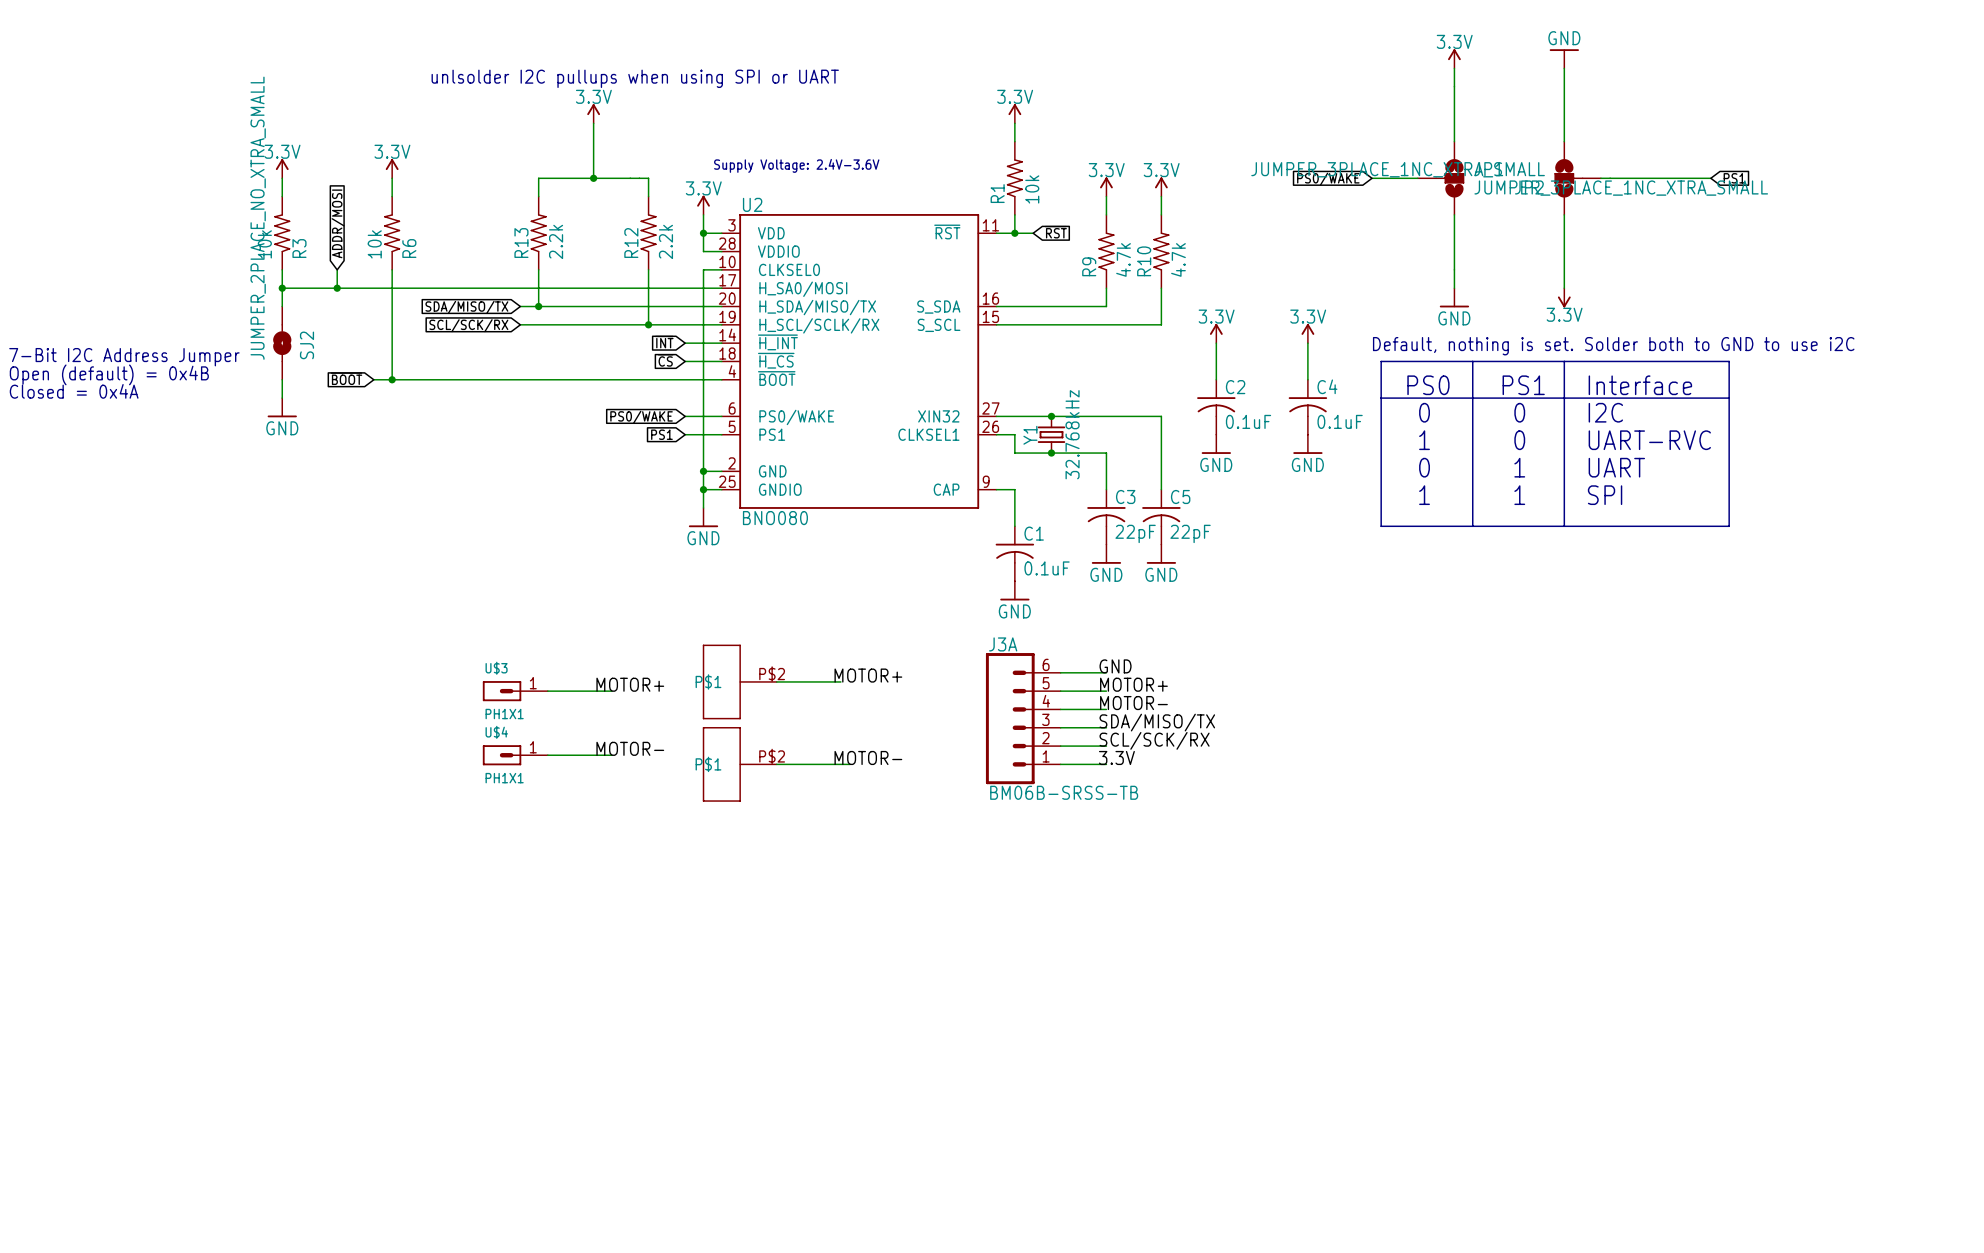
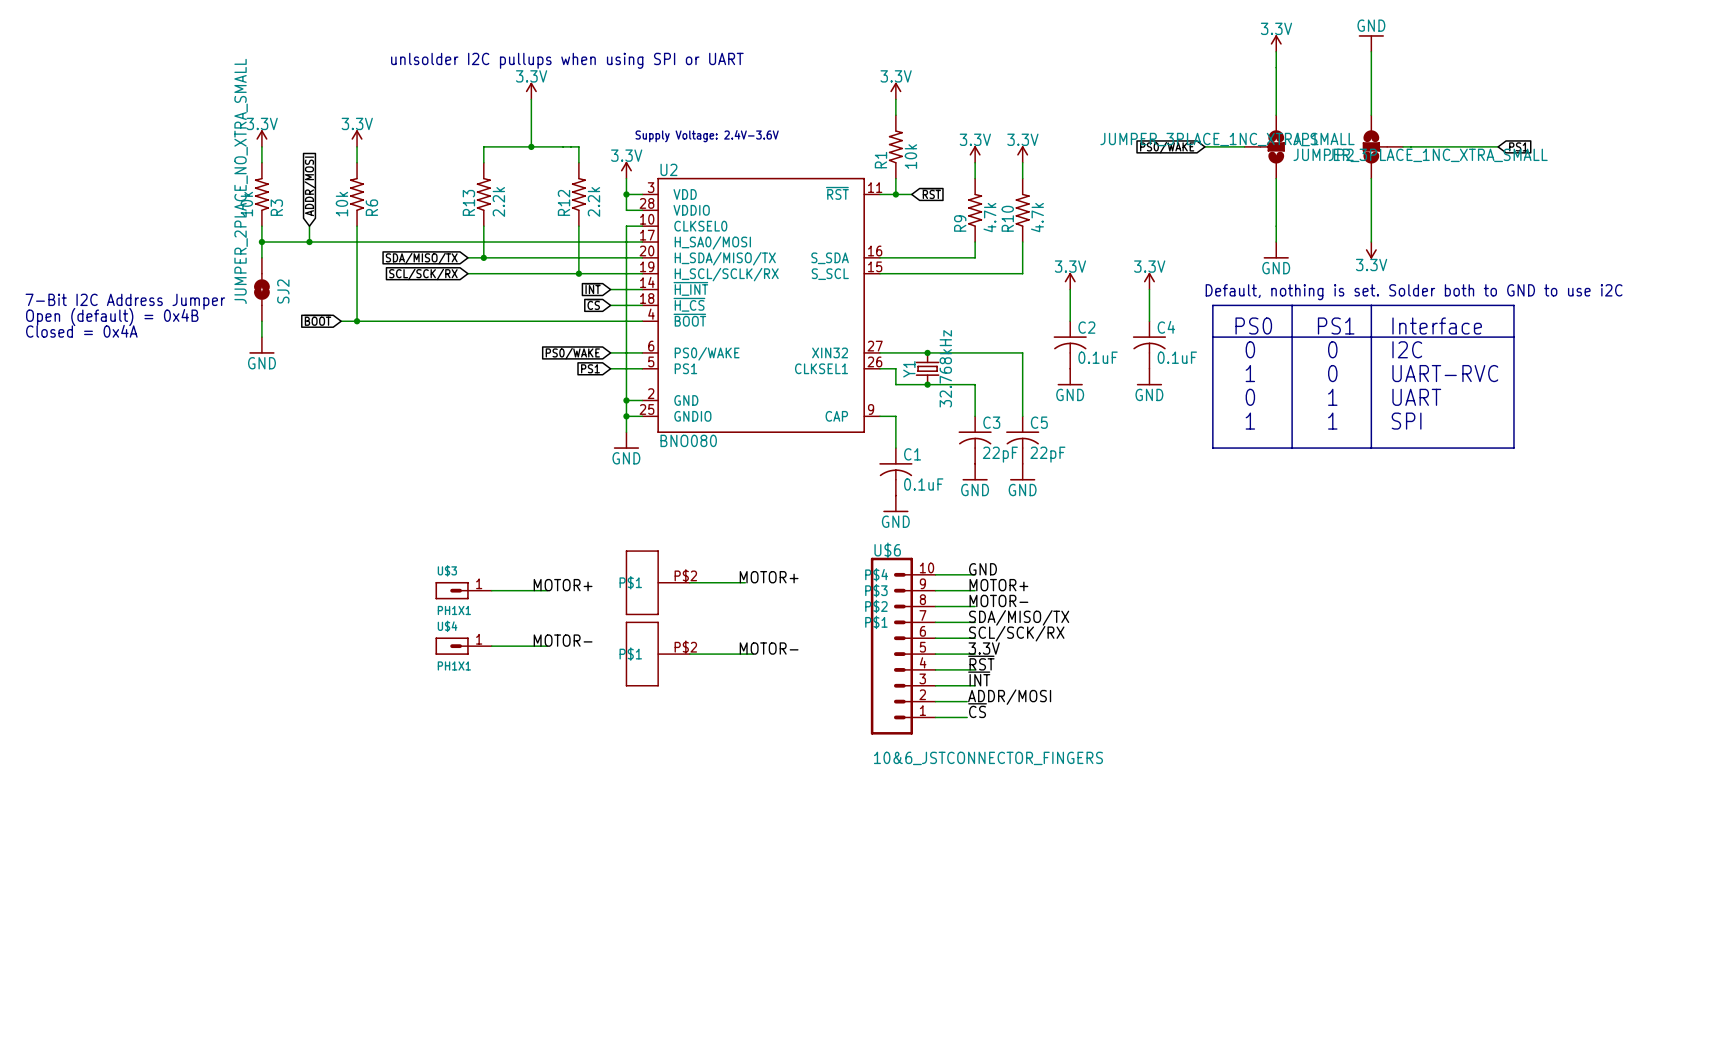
J3A: BM06B-SRSS-TB (1023, 718) -> none
U$6: none -> 10&6_JSTCONNECTOR_FINGERS (903, 646)
label: none -> ~{RST} (981, 663)
wire: none -> (935, 669) (975, 669)
label: none -> ~{INT} (979, 678)
wire: none -> (935, 685) (975, 685)
label: none -> ADDR/MOSI (1009, 697)
wire: none -> (935, 701) (967, 701)
label: none -> ~{CS} (977, 710)
wire: none -> (935, 717) (967, 717)

